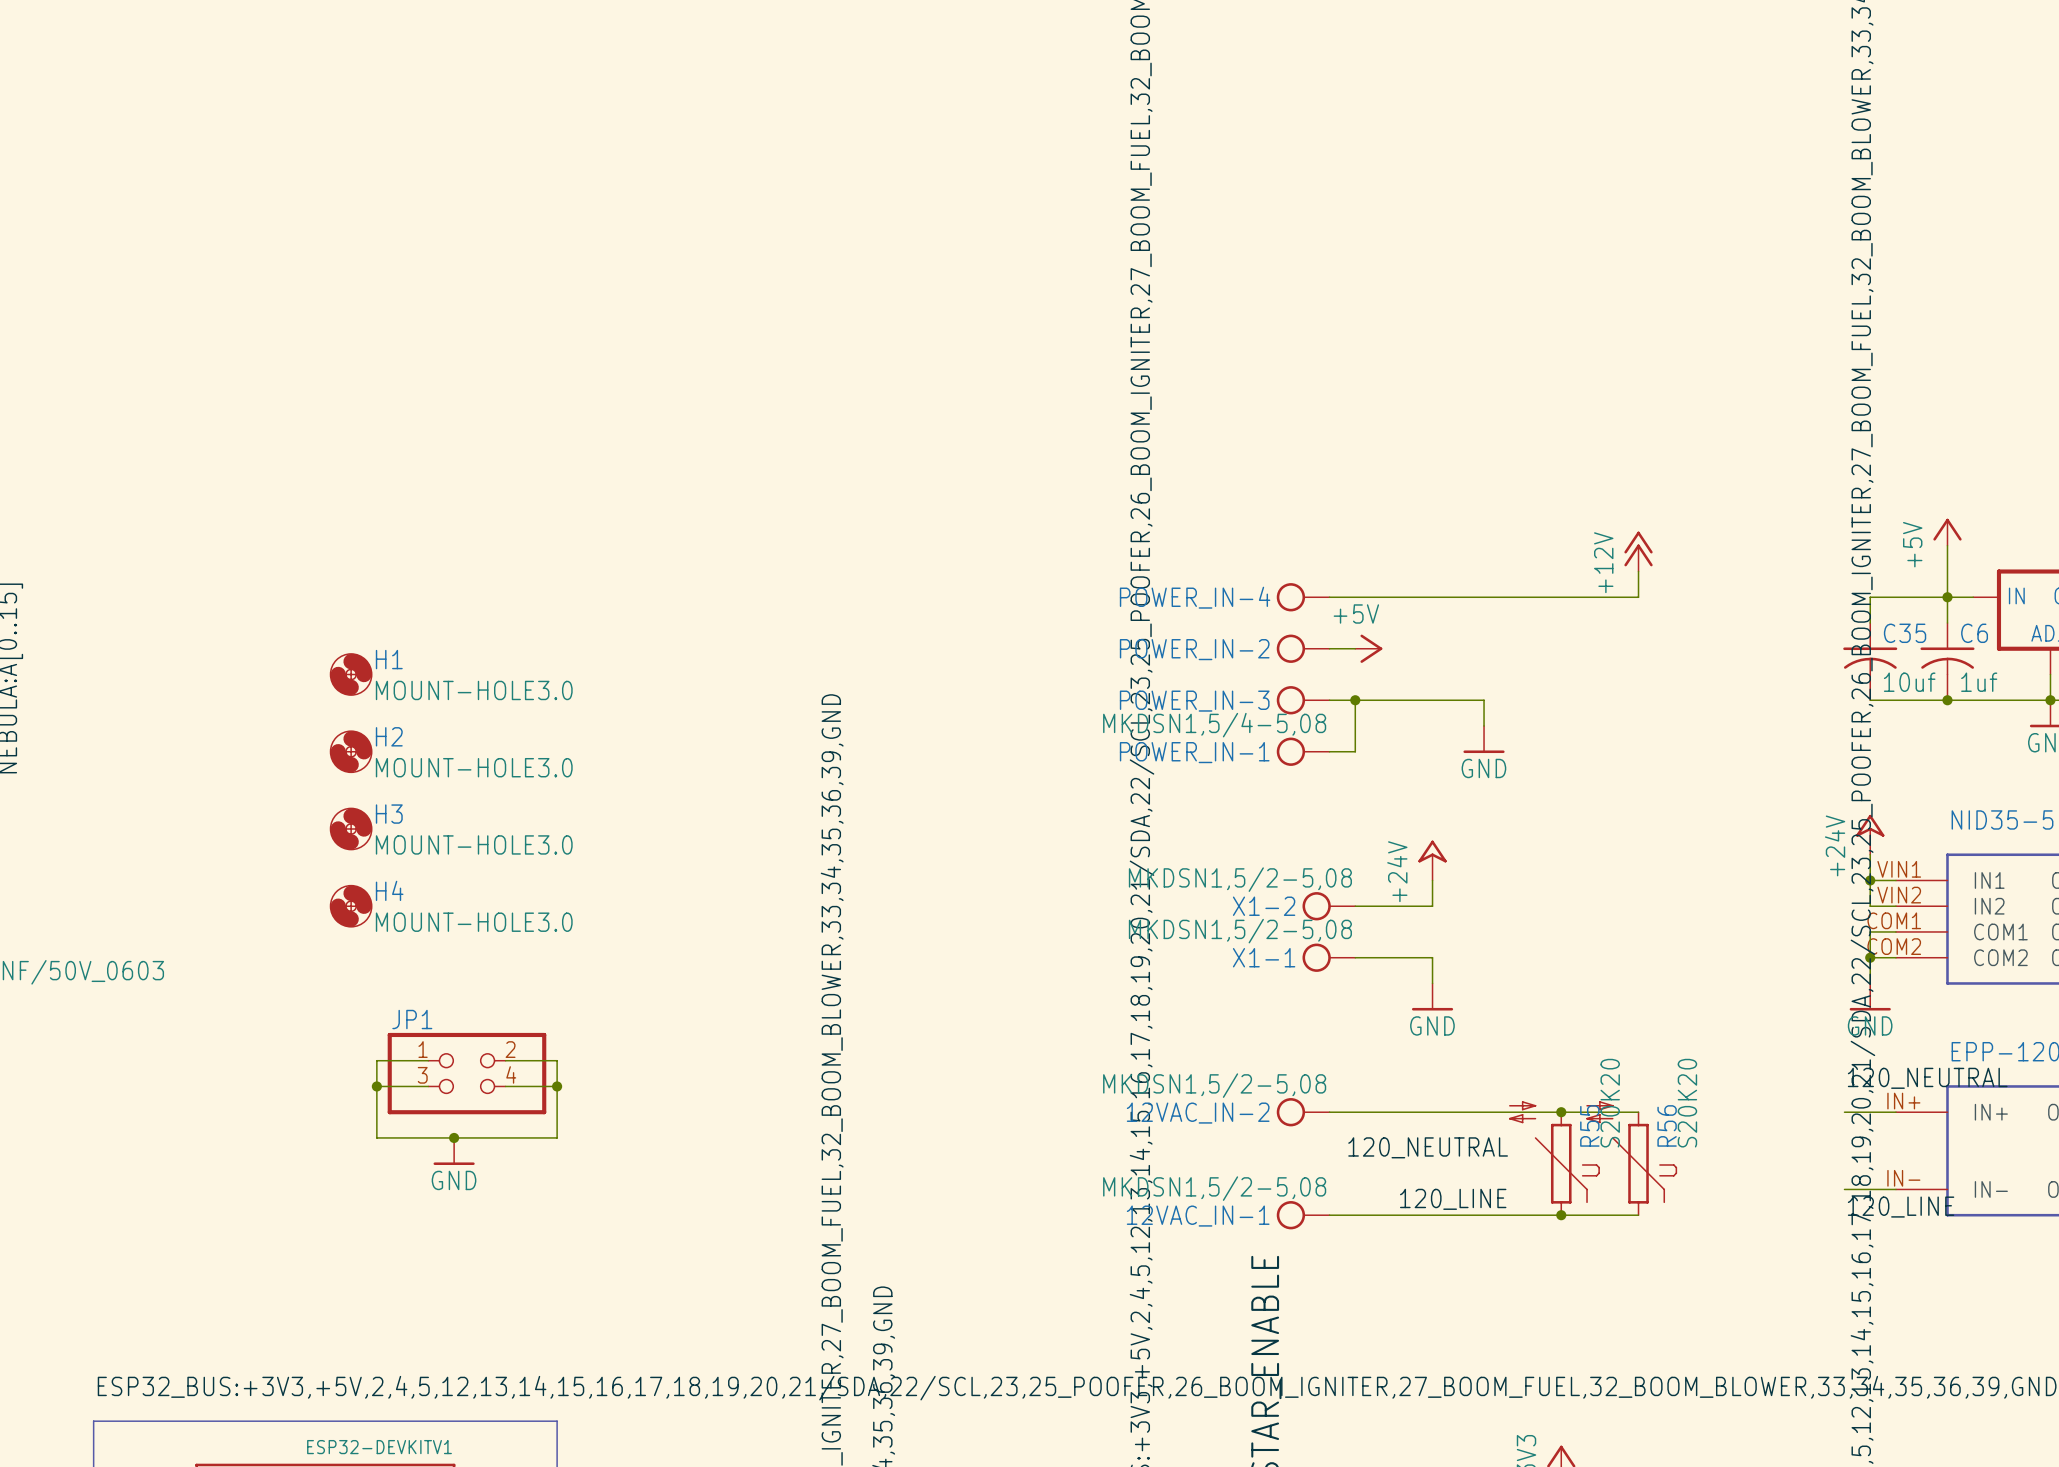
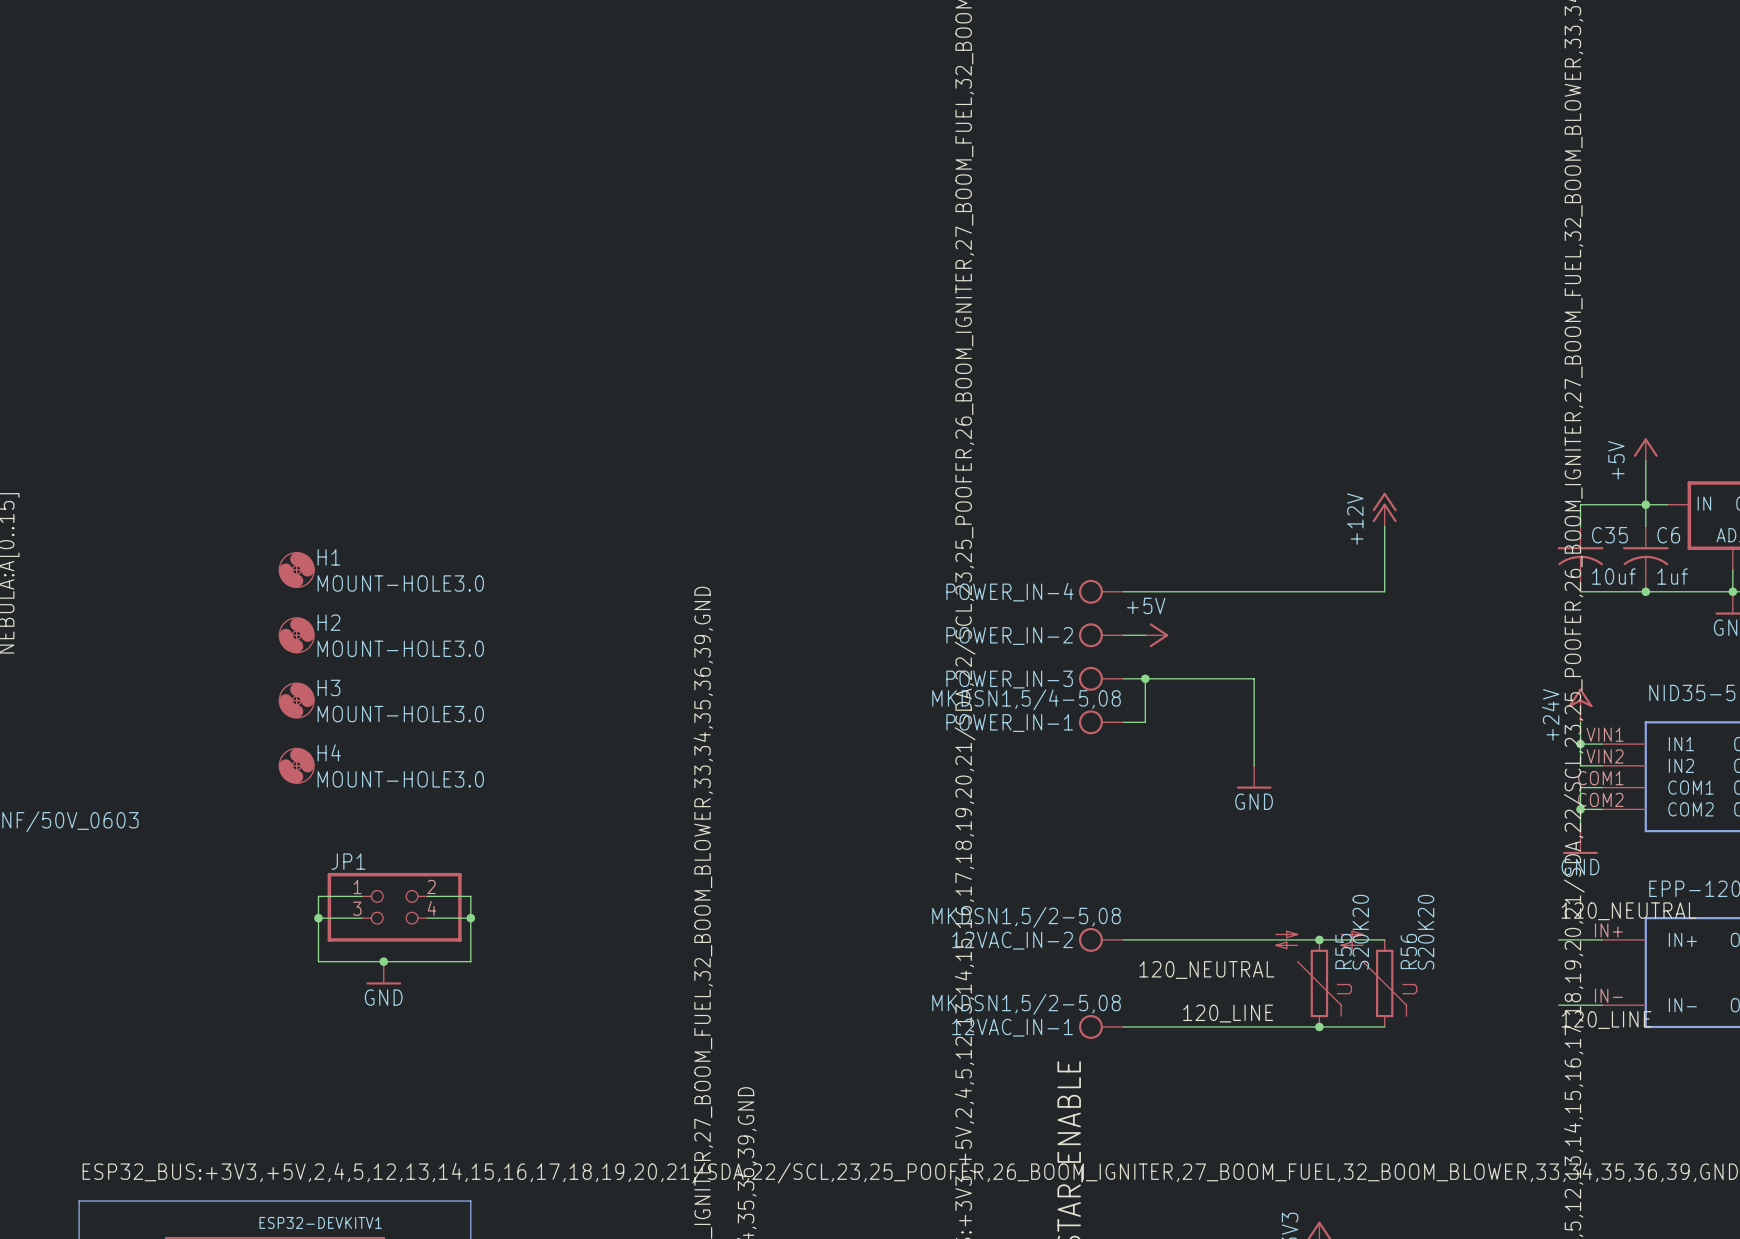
power symbol position: +12V (1638, 551) -> +12V (1384, 509)
wire: (1638, 571) (1638, 597) (1329, 597) -> none
POWER_IN-4: (1303, 597) -> none
POWER_IN-2: (1303, 648) -> none
wire: (1329, 648) (1355, 648) -> none
power symbol position: +5V (1368, 648) -> +5V (1156, 635)
wire: (1355, 700) (1355, 751) -> none
junction: (1355, 700) -> none
wire: (1484, 700) (1484, 726) -> (1254, 591) (1384, 591) (1384, 526)
POWER_IN-3 name: POWER_IN-3 (1194, 701) -> POWER_IN-4 (1009, 592)
POWER_IN-1 value: MKDSN1,5/4-5,08 (1214, 725) -> none
power symbol: GND (1484, 739) -> none
POWER_IN-1 name: POWER_IN-1 (1194, 752) -> POWER_IN-2 (1009, 636)
POWER_IN-3: none -> (1101, 678)
wire: none -> (1123, 678) (1254, 678) (1254, 765)
wire: none -> (1145, 678) (1145, 722) (1123, 722)
junction: none -> (1145, 678)
POWER_IN-1: none -> MKDSN1,5/4-5,08 (1101, 722)
power symbol: +24V (1432, 860) -> none
wire: (1432, 880) (1432, 906) (1355, 906) -> none
X1-2: MKDSN1,5/2-5,08 (1328, 906) -> none
power symbol: none -> GND (1254, 777)
X1-1: MKDSN1,5/2-5,08 (1328, 957) -> none
wire: (1355, 957) (1432, 957) (1432, 983) -> none
power symbol: GND (1432, 996) -> none

